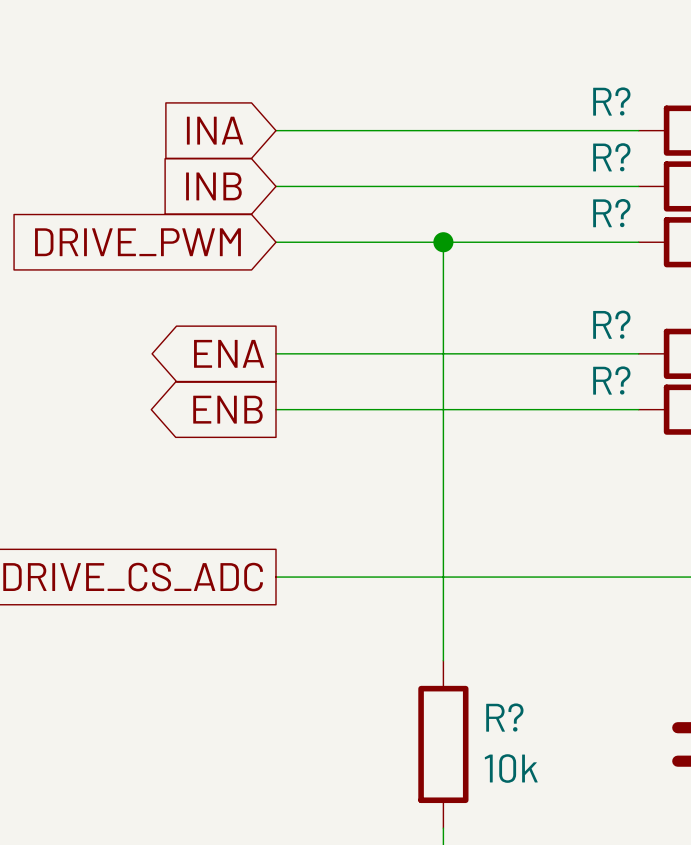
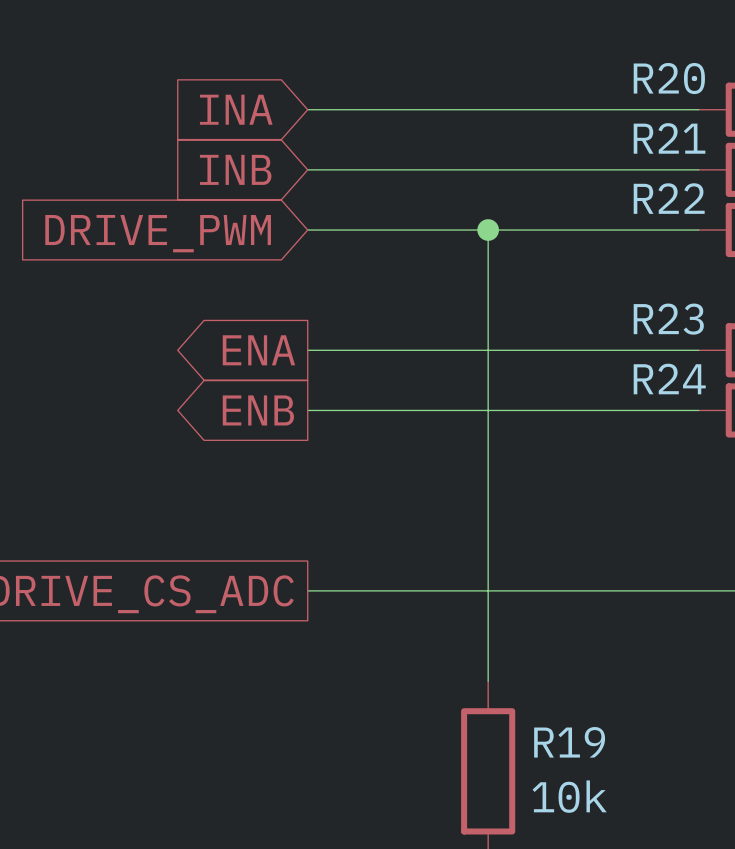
R? name: R? (611, 101) -> R20 (669, 78)
R? name: R? (611, 157) -> R21 (669, 138)
R? name: R? (611, 213) -> R22 (669, 198)
R? name: R? (611, 324) -> R23 (668, 319)
R? name: R? (611, 380) -> R24 (669, 379)
R? name: R? (504, 717) -> R19 (569, 742)

